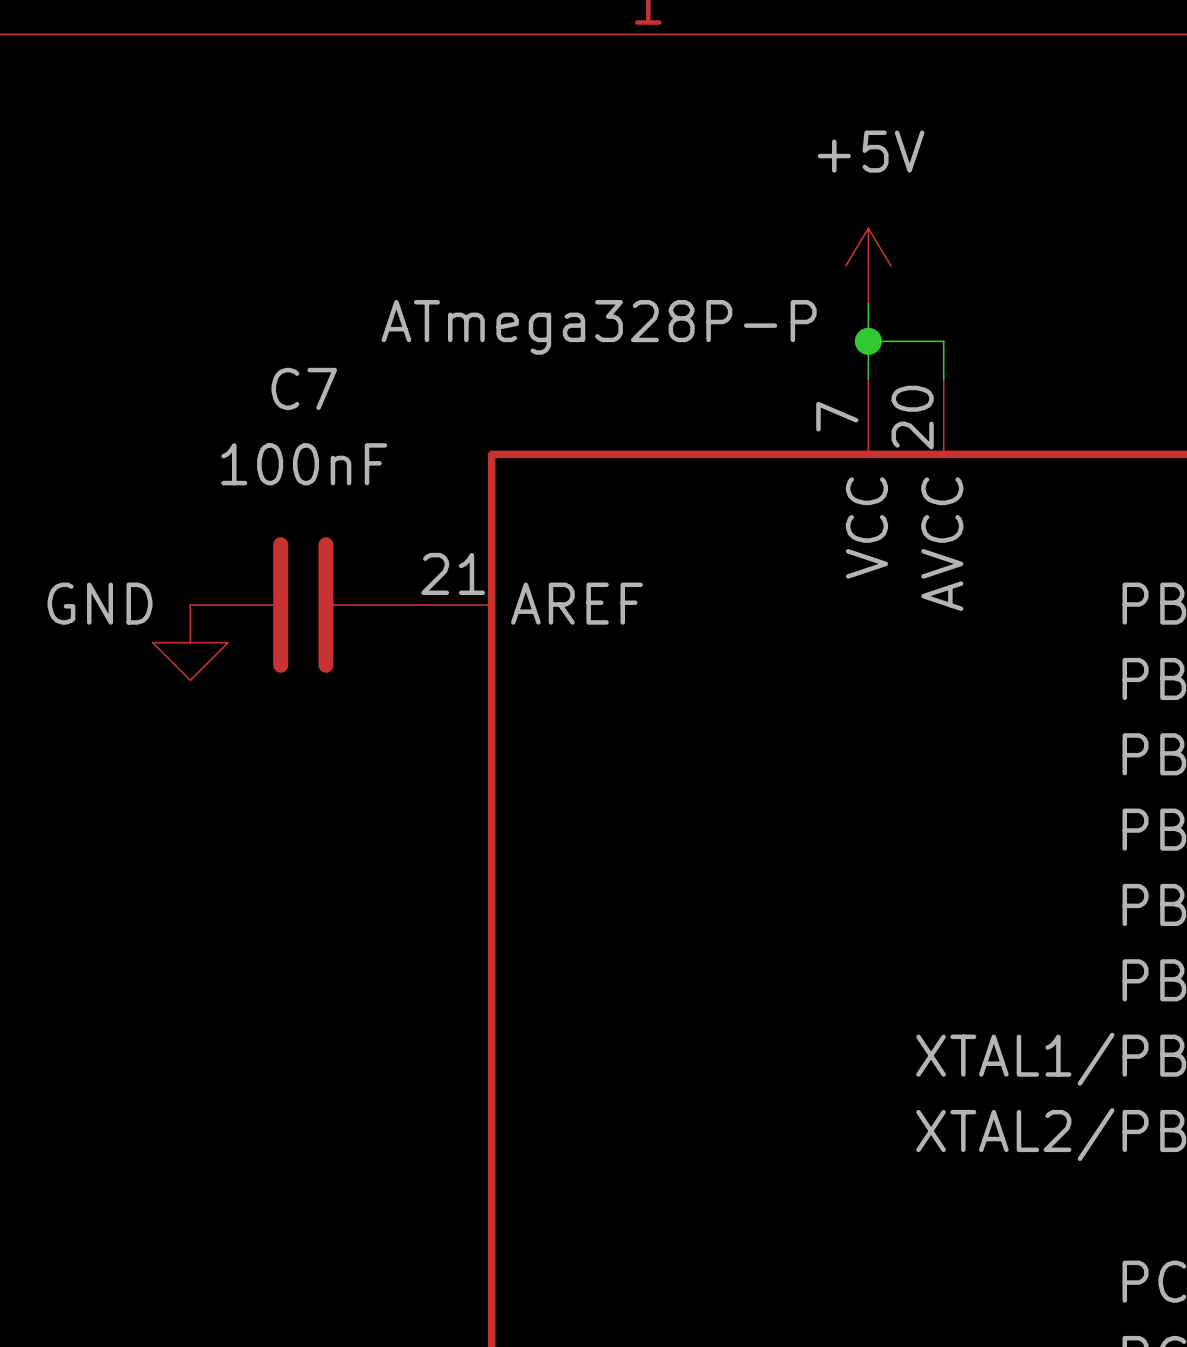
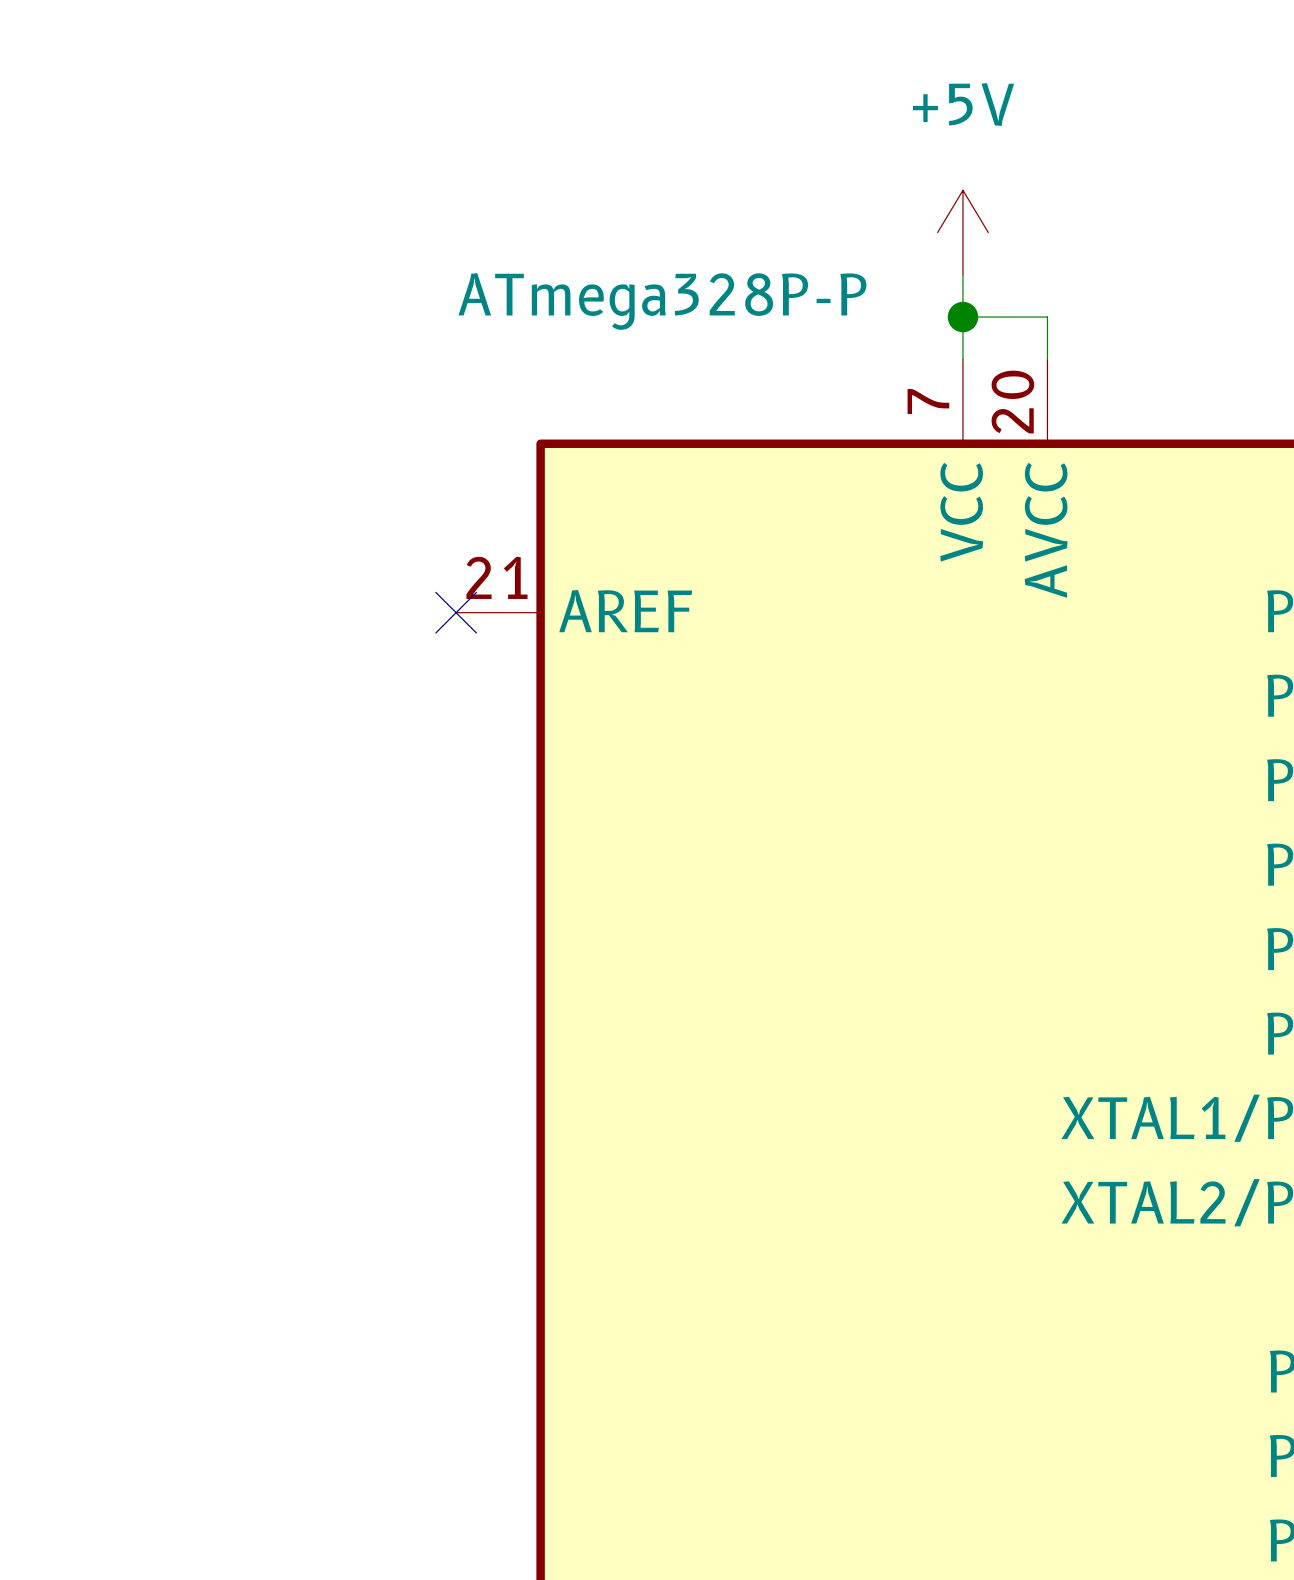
C7: 100nF (303, 605) -> none
no-connect mark: none -> (456, 612)
power symbol: GND (190, 642) -> none

